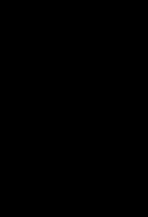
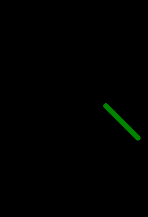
bottom track: none -> (105, 105) (137, 137) (105, 105)

